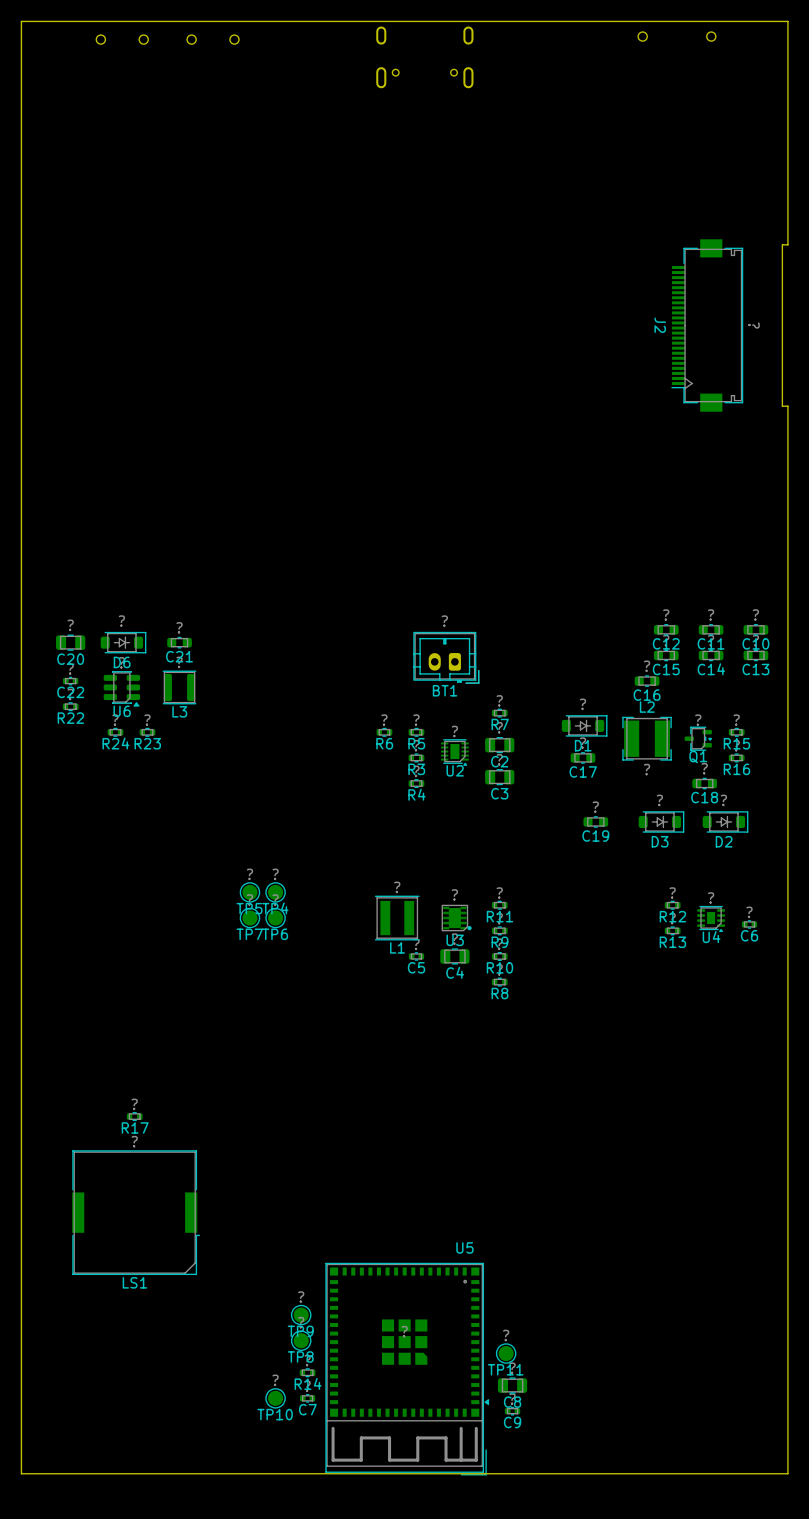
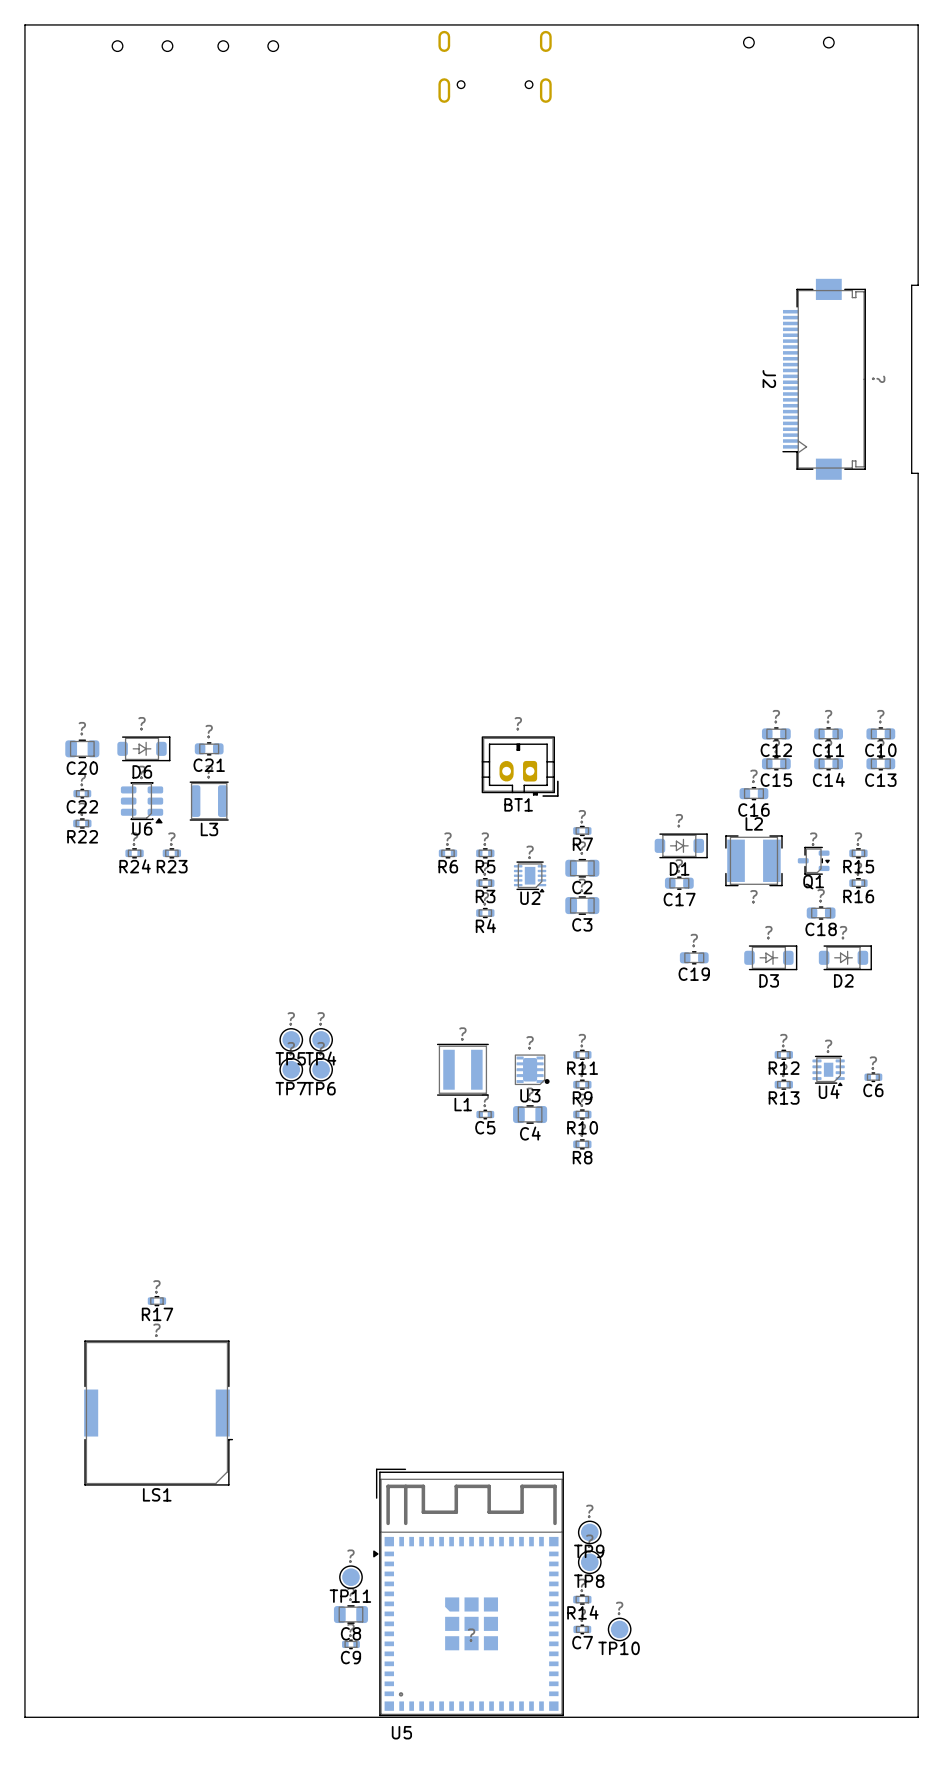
TP9 position: (301, 1315) -> (589, 1532)
TP8 position: (301, 1340) -> (589, 1562)
TP11 position: (506, 1353) -> (350, 1577)
U5 rotation: 0° (407, 1369) -> 180° (468, 1592)
R14 position: (307, 1372) -> (582, 1599)
C8 position: (512, 1385) -> (350, 1614)
TP10 position: (275, 1398) -> (619, 1629)
C7 position: (307, 1398) -> (582, 1629)
C9 position: (512, 1411) -> (350, 1644)

